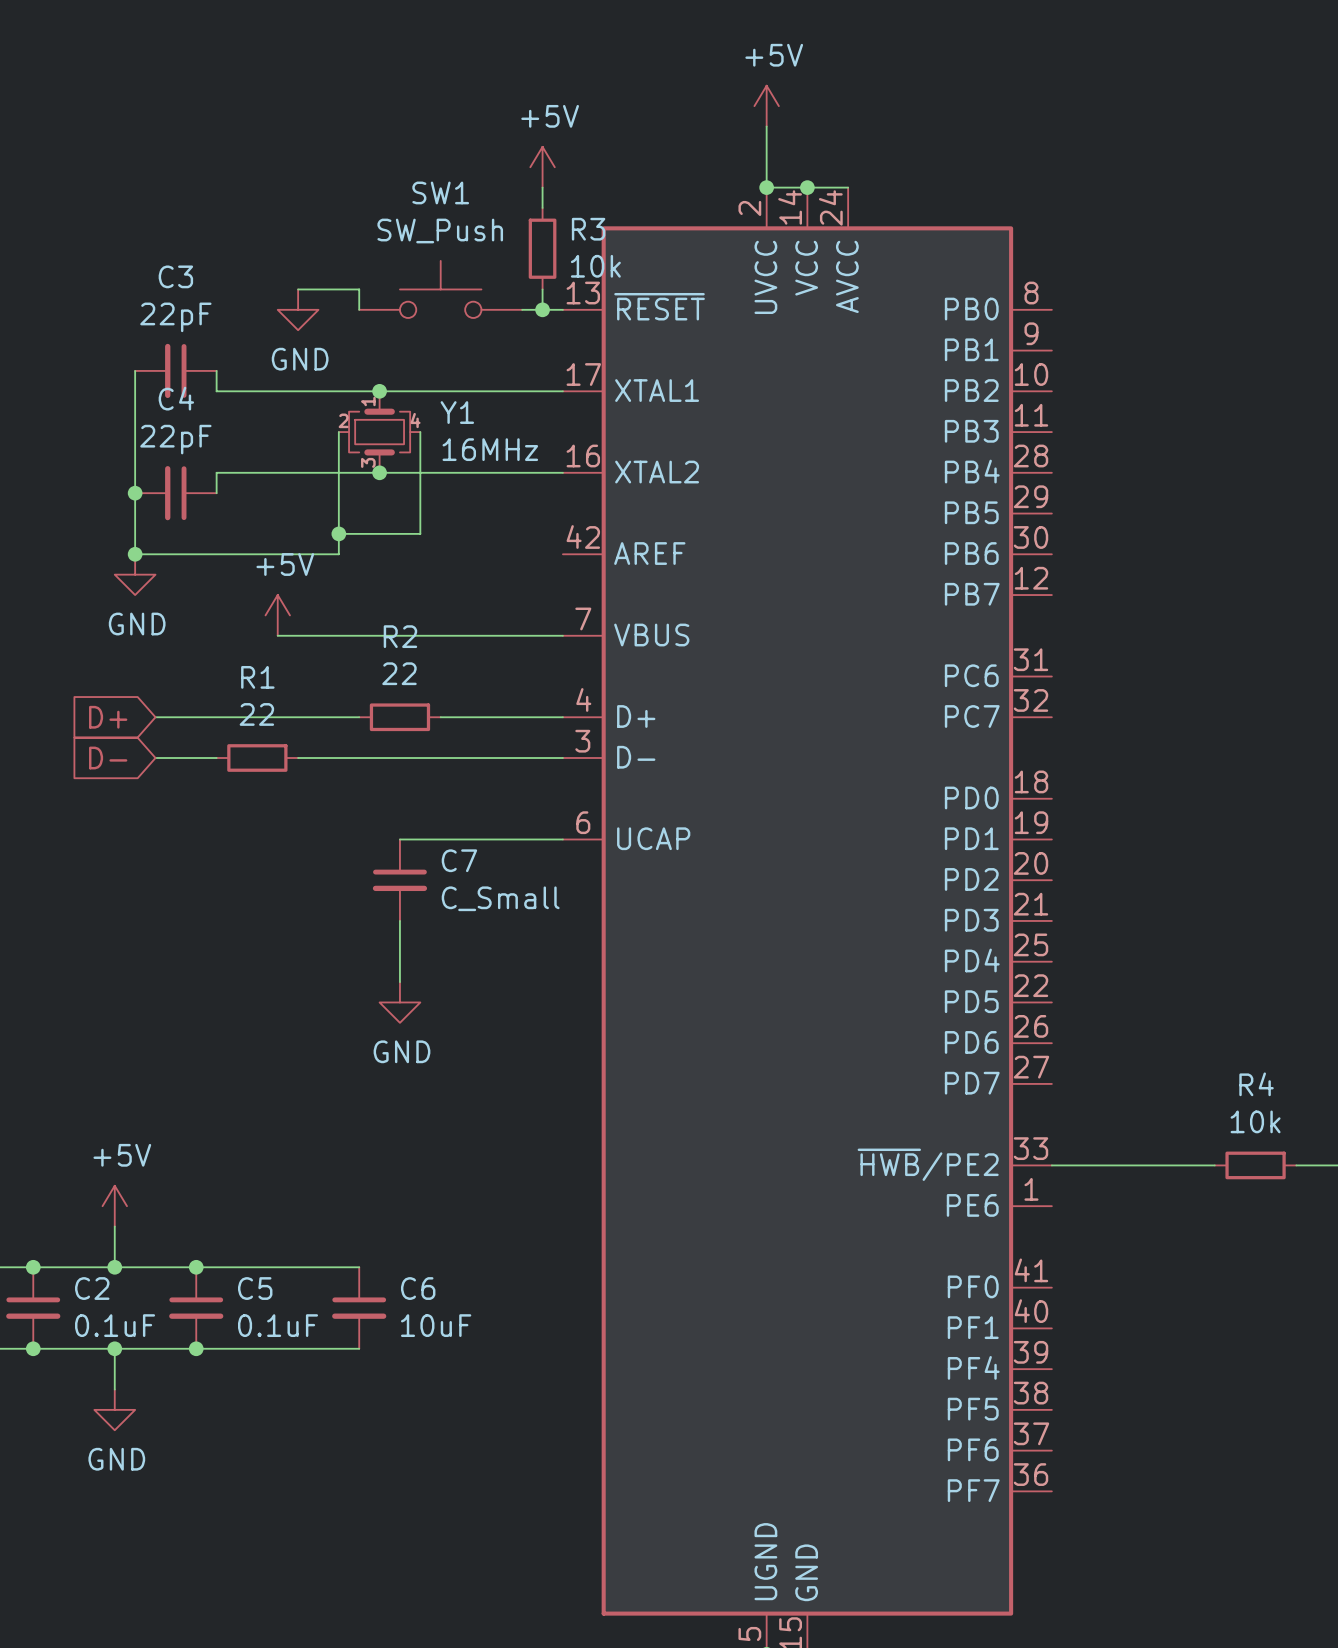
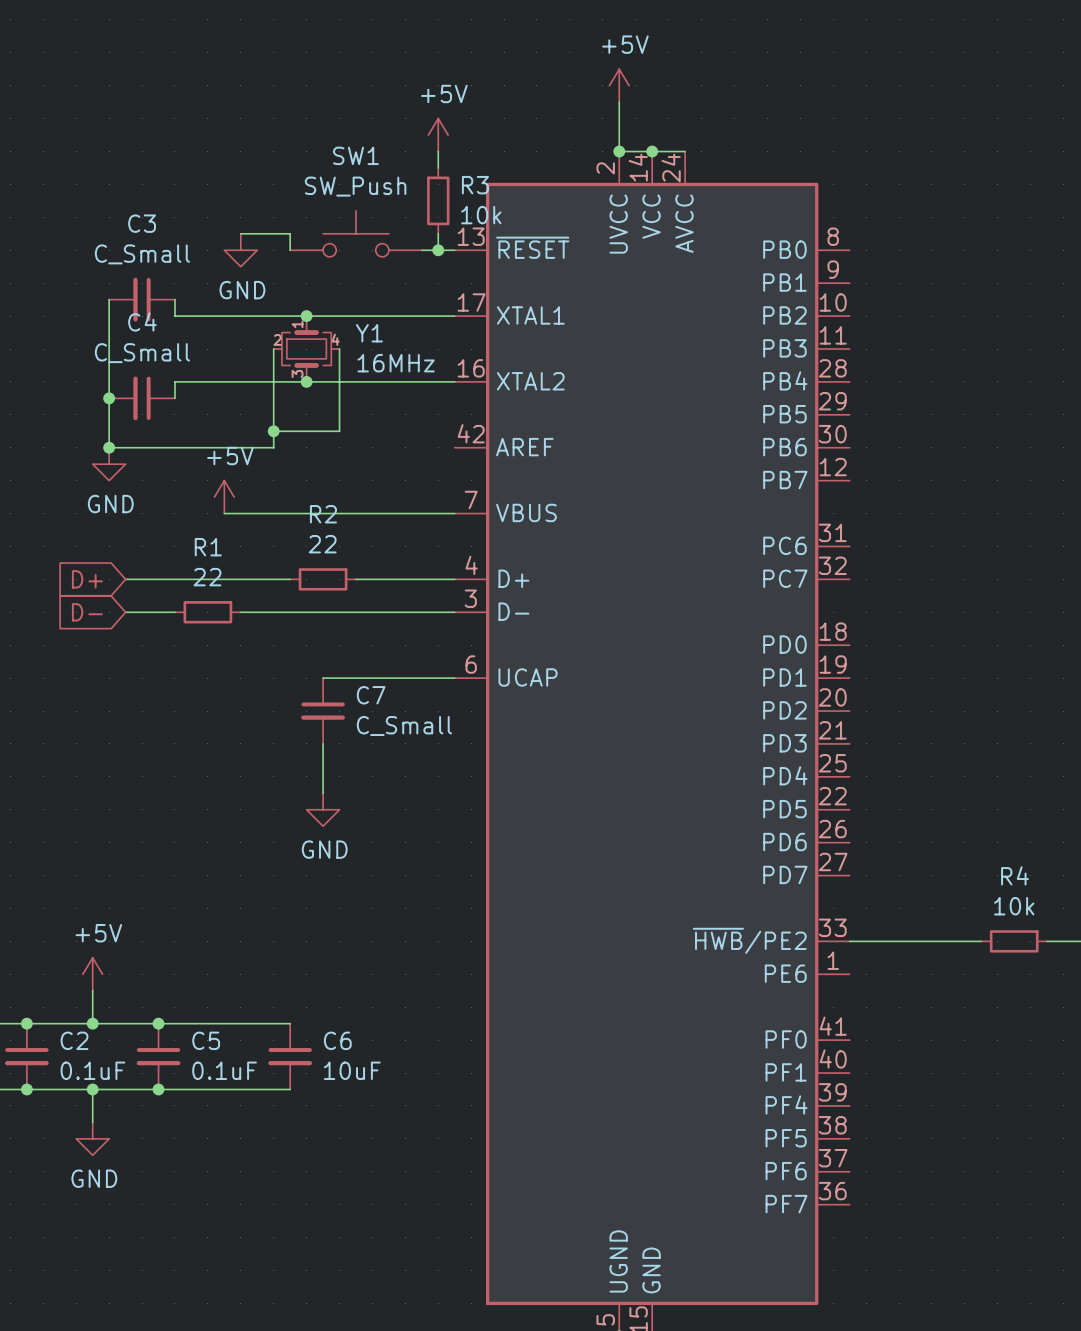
C3 value: 22pF (175, 317) -> C_Small (142, 254)
C4 value: 22pF (175, 439) -> C_Small (142, 353)

